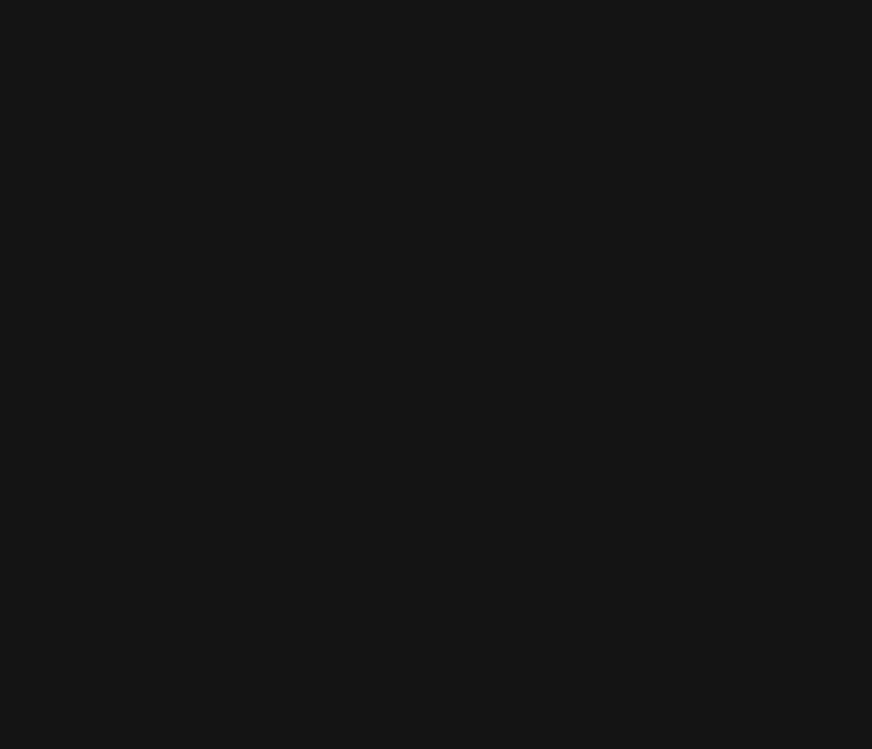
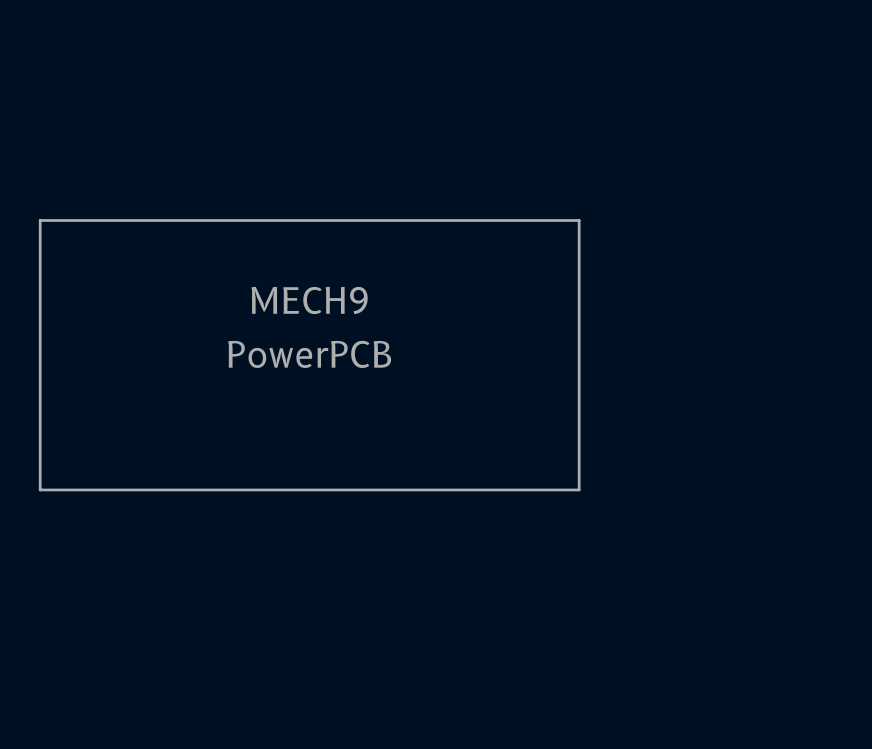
MECH9: none -> PowerPCB (309, 355)

